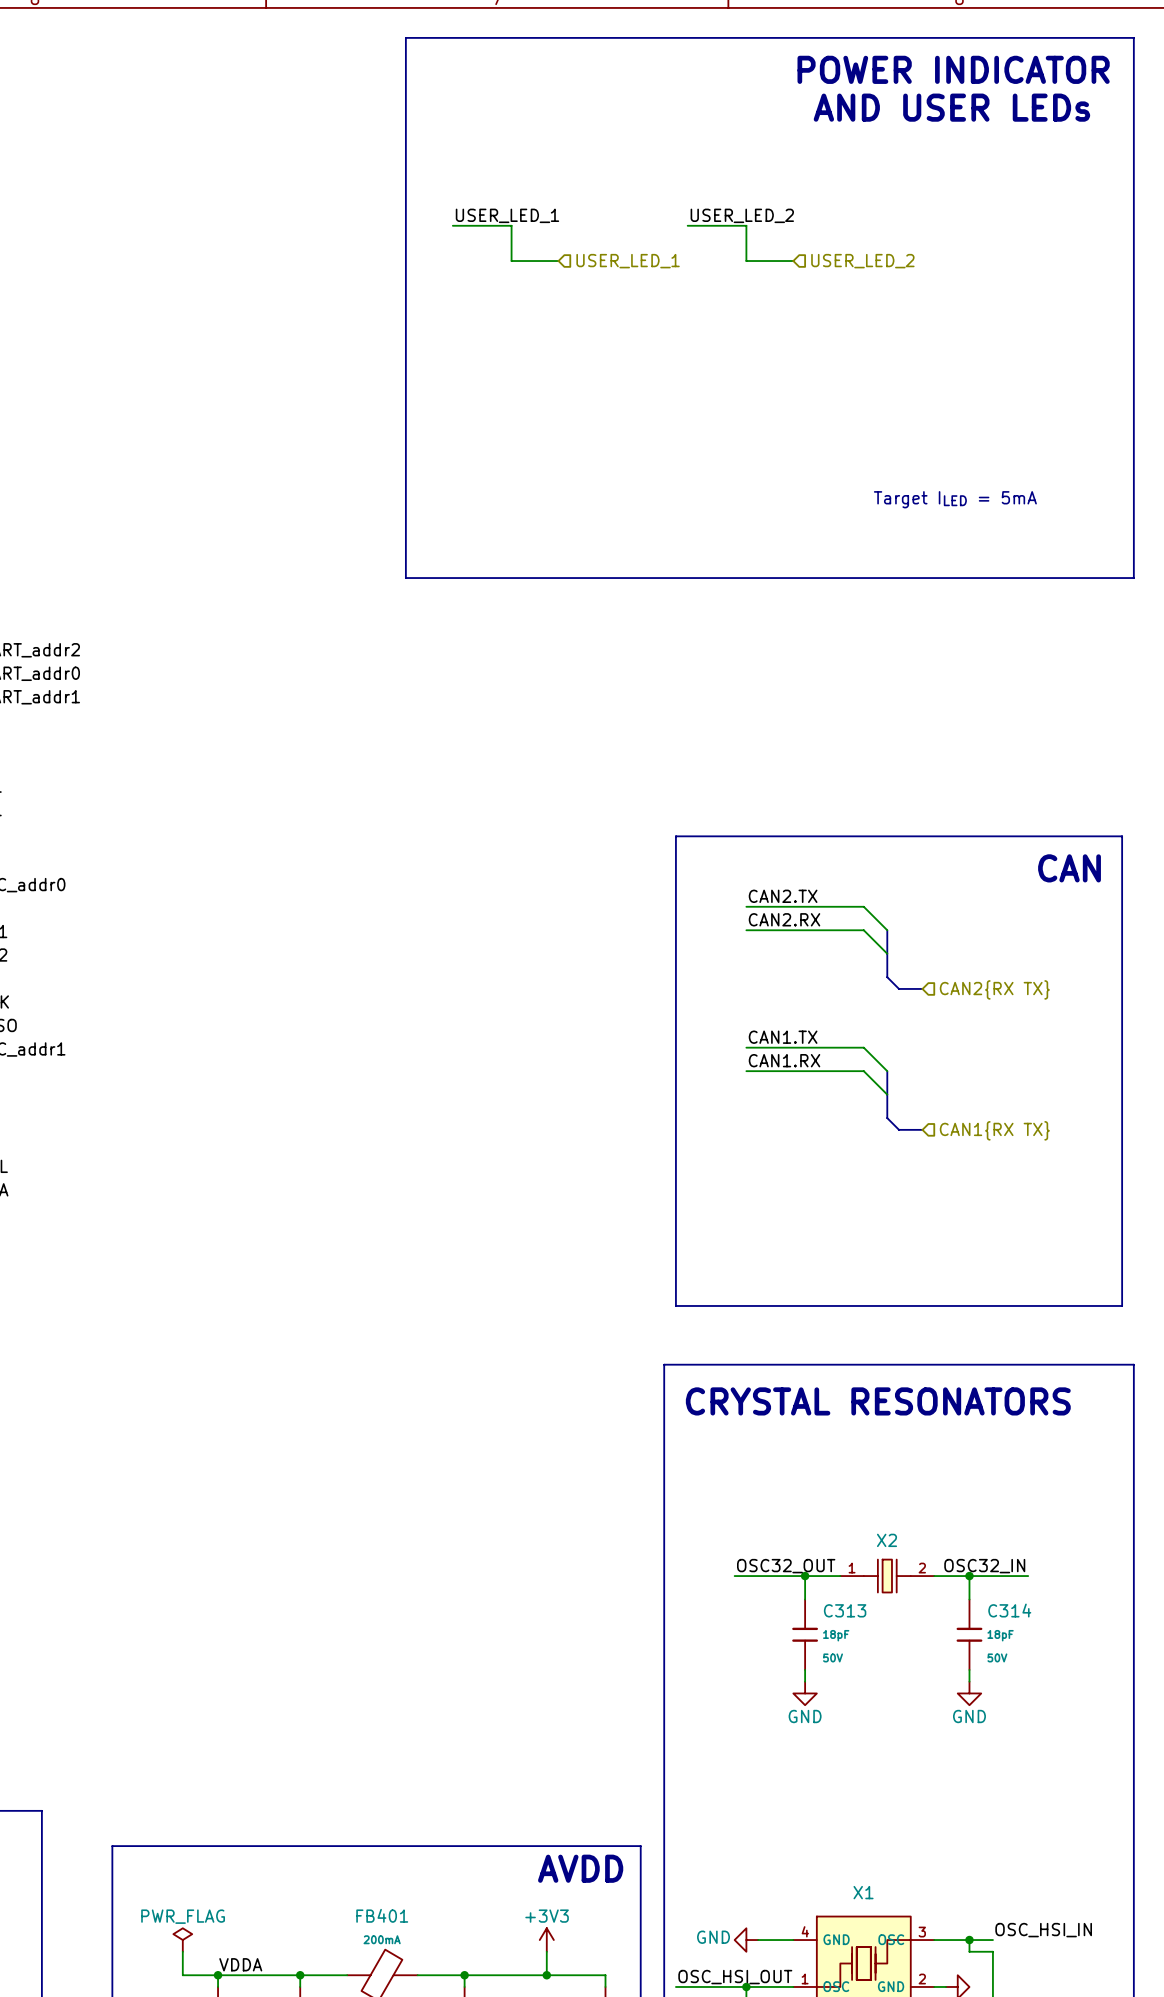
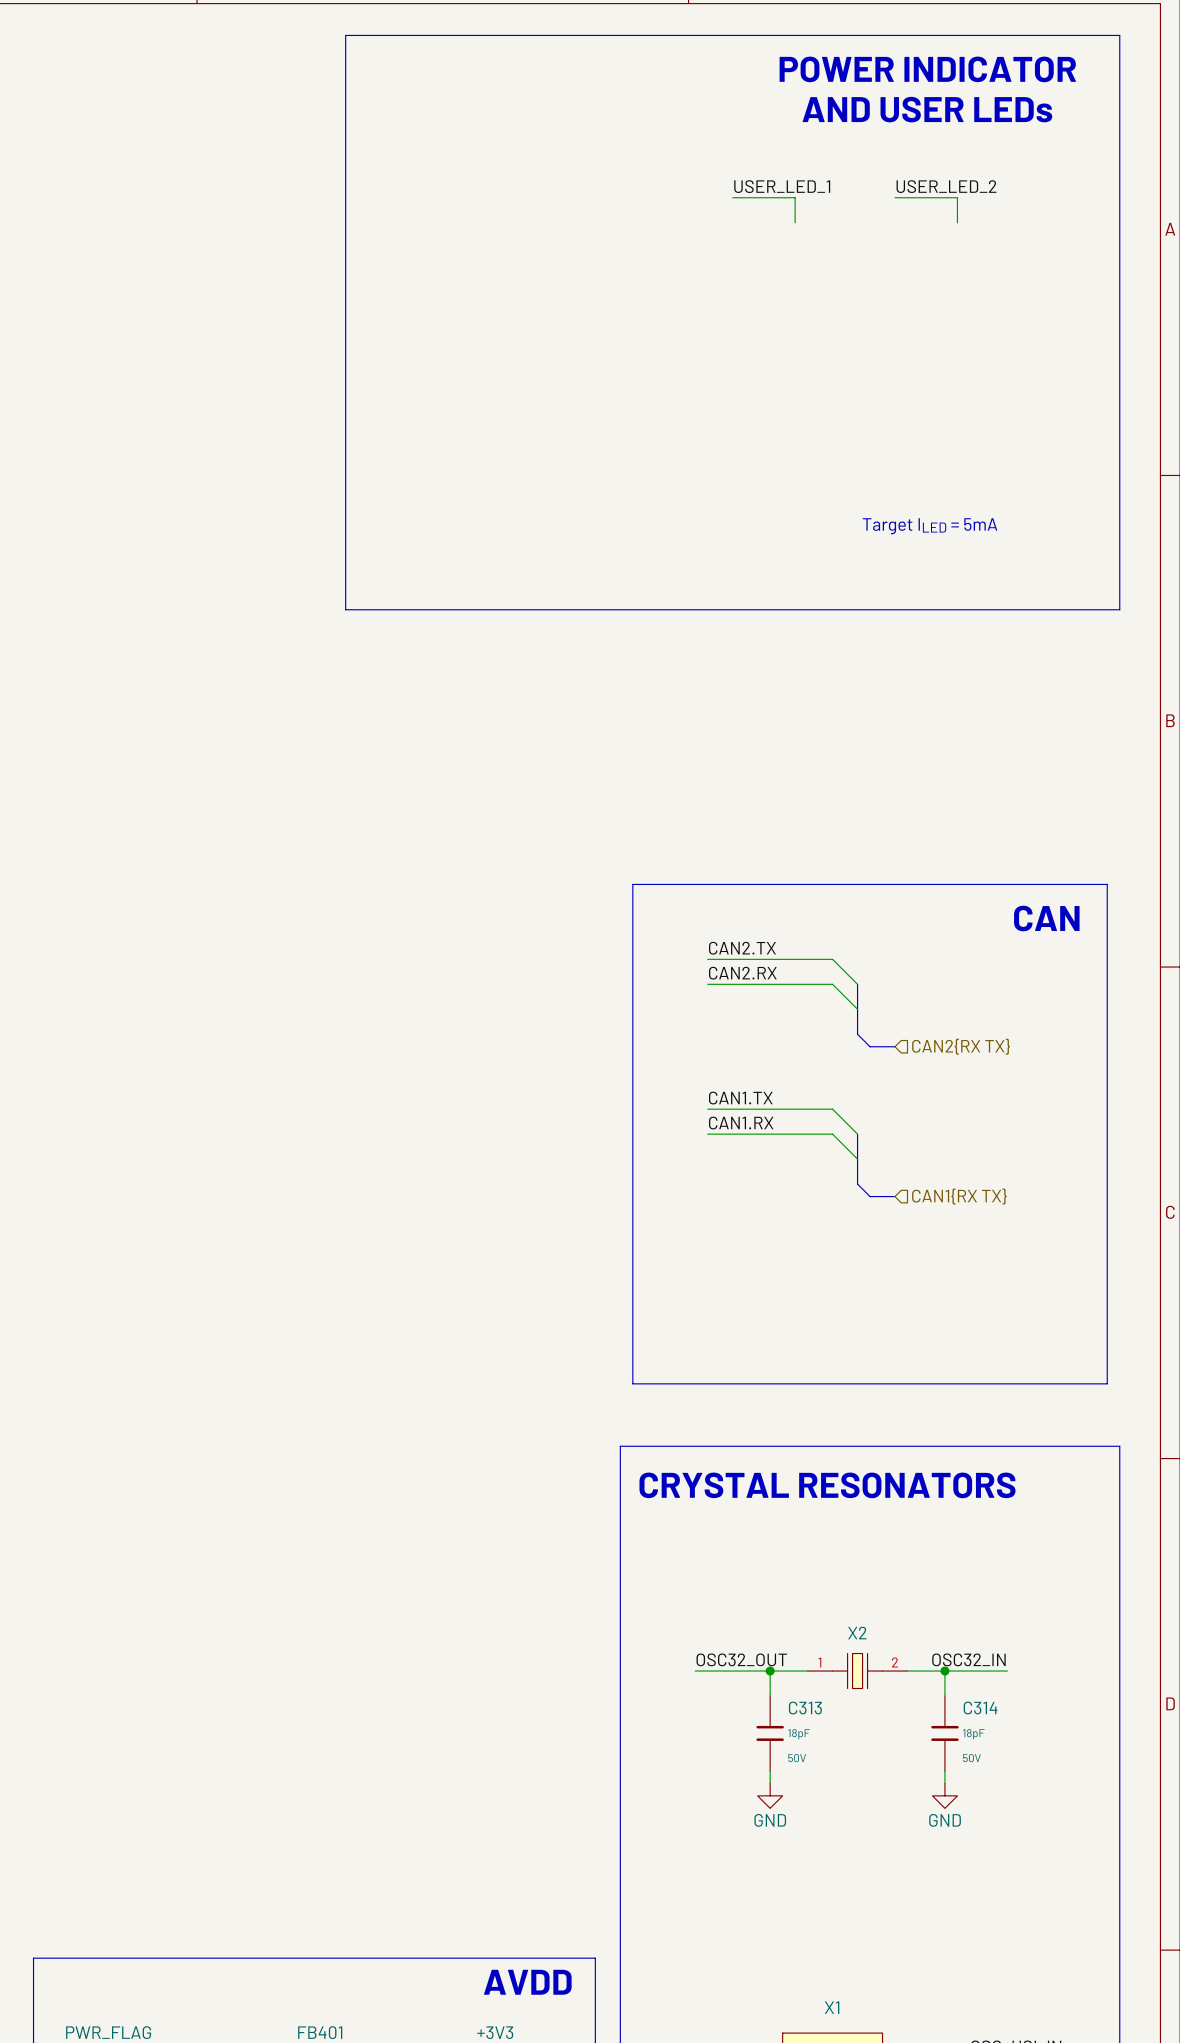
label: none -> USER_LED_1 (782, 186)
label: none -> USER_LED_2 (946, 186)
wire: none -> (732, 197) (795, 197) (795, 222)
wire: none -> (895, 197) (957, 197) (957, 222)
label: USER_LED_1 (507, 215) -> none
label: USER_LED_2 (742, 215) -> none
wire: (452, 225) (511, 225) (511, 261) (558, 261) -> none
wire: (687, 225) (746, 225) (746, 261) (793, 261) -> none
hierarchical label: USER_LED_1 (628, 261) -> none
hierarchical label: USER_LED_2 (862, 261) -> none

